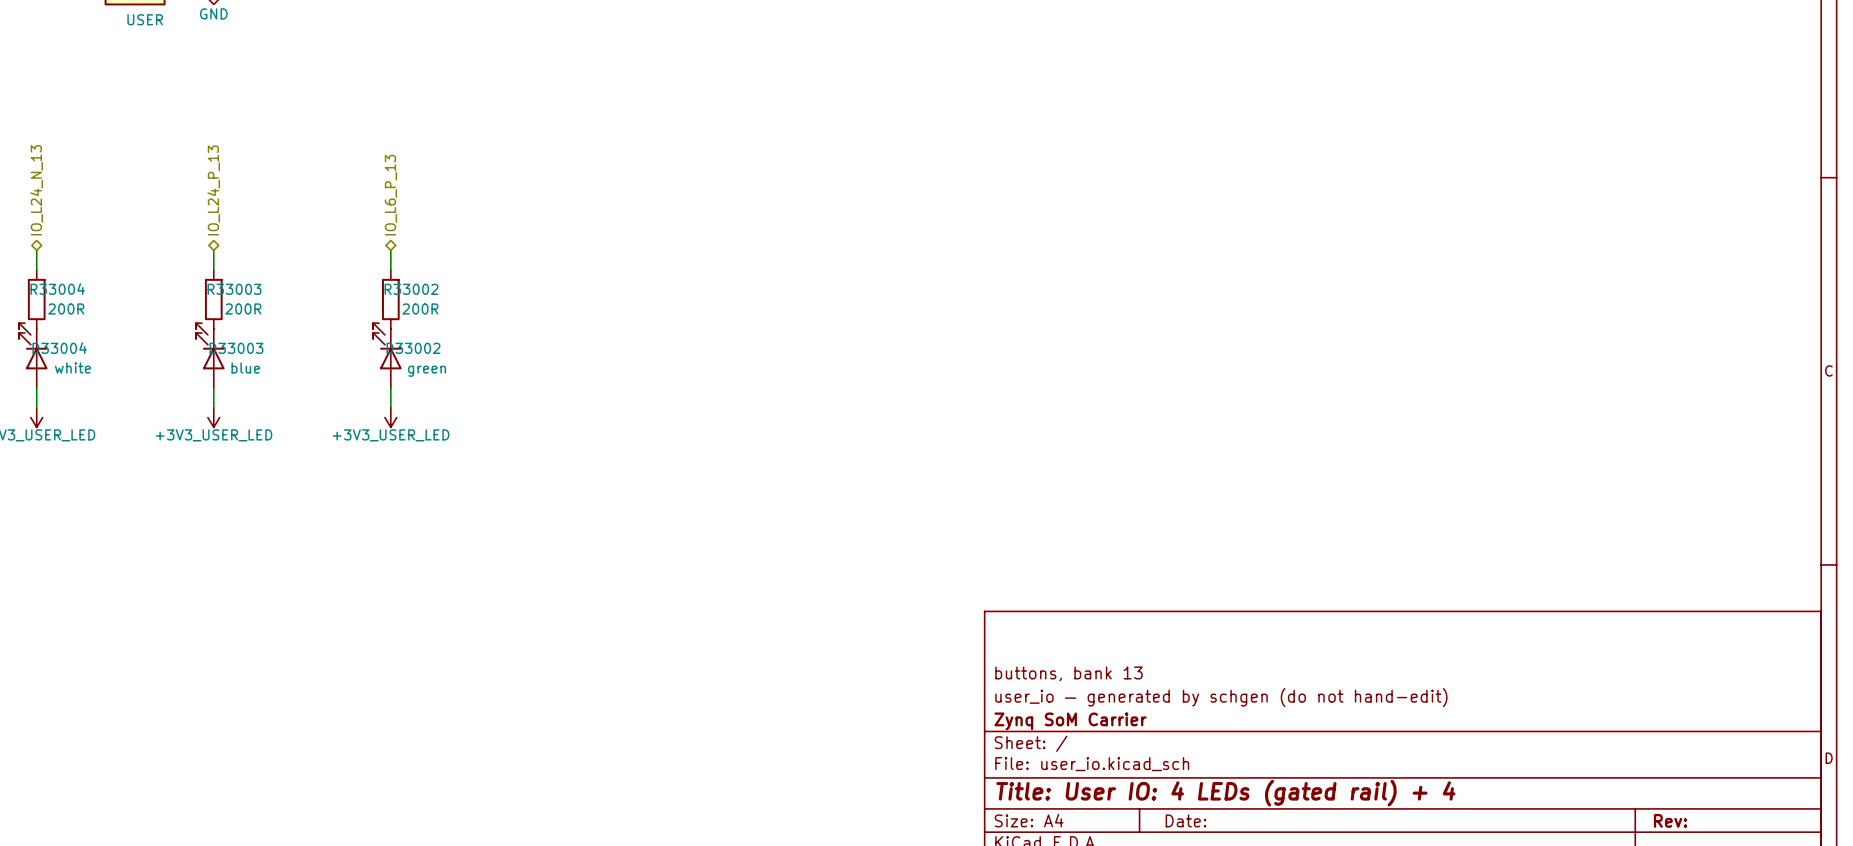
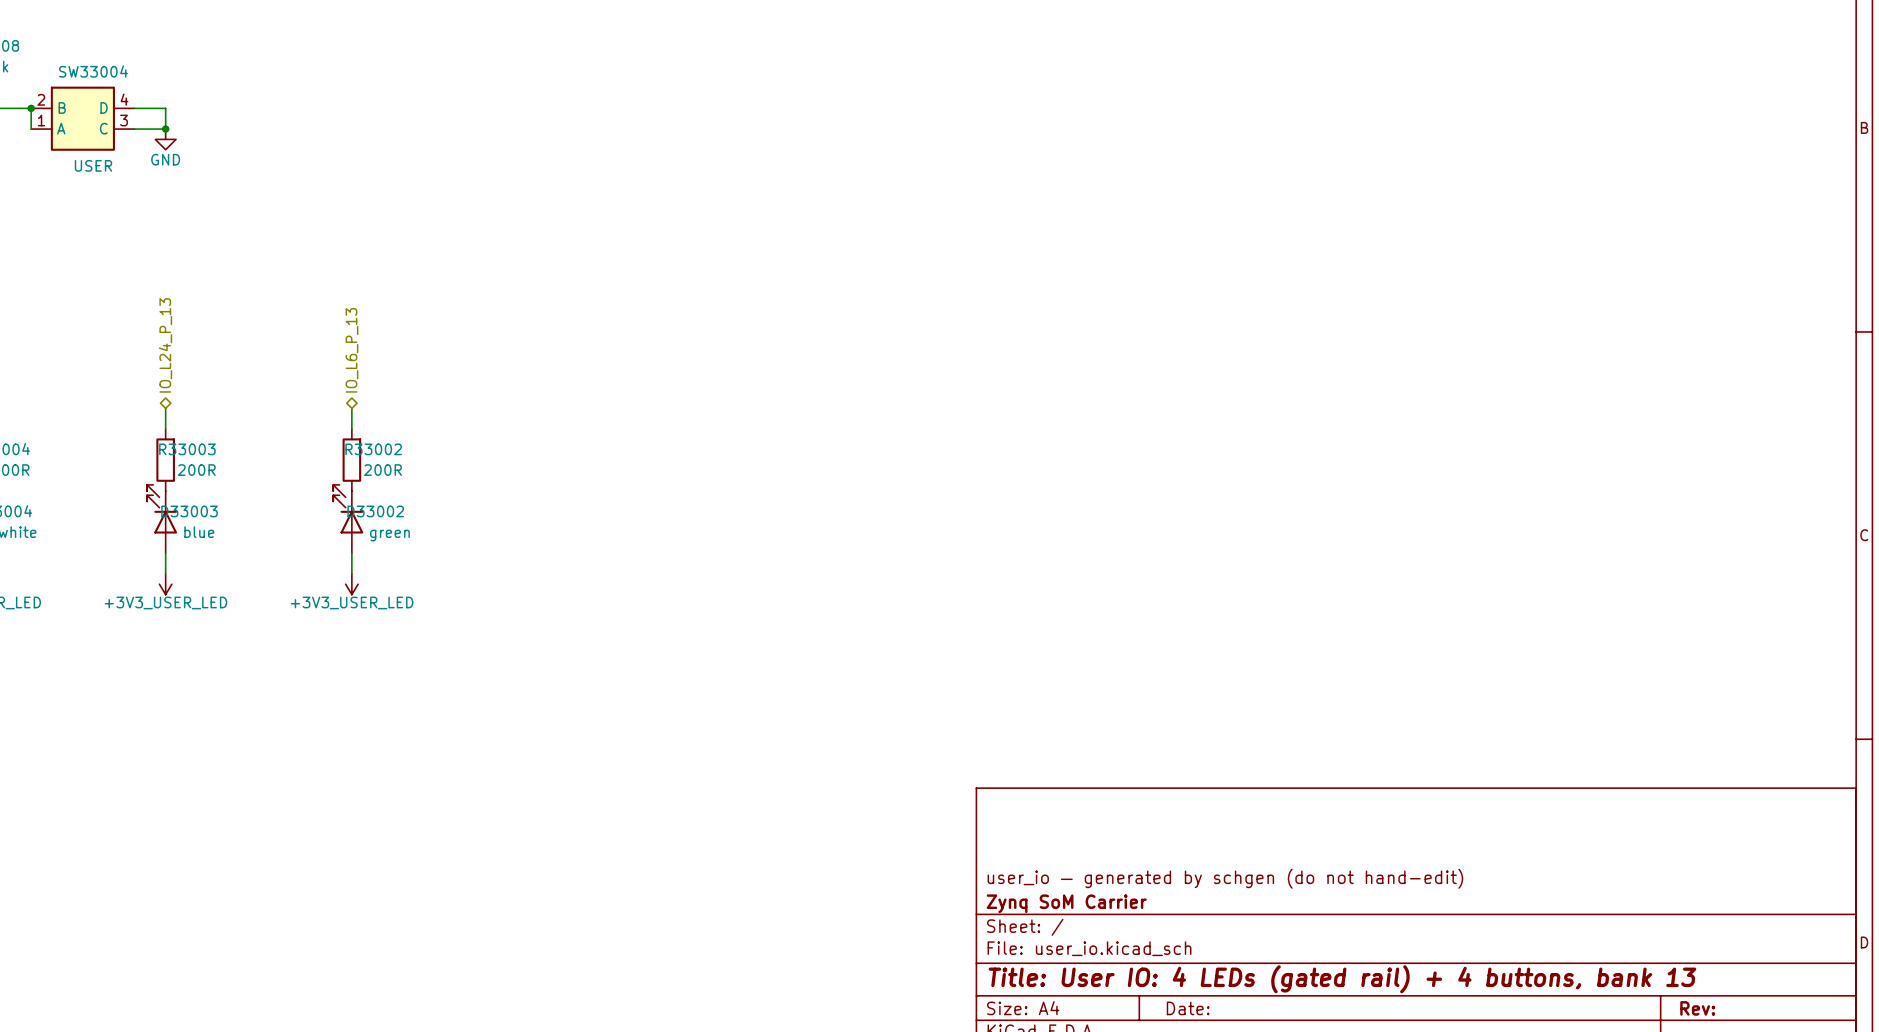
title block: buttons, bank 13 (1068, 673) -> none
title block: Title: User IO: 4 LEDs (gated rail) + 4 (1225, 793) -> Title: User IO: 4 LEDs (gated rail) + 4 buttons, bank 13 (1342, 979)

